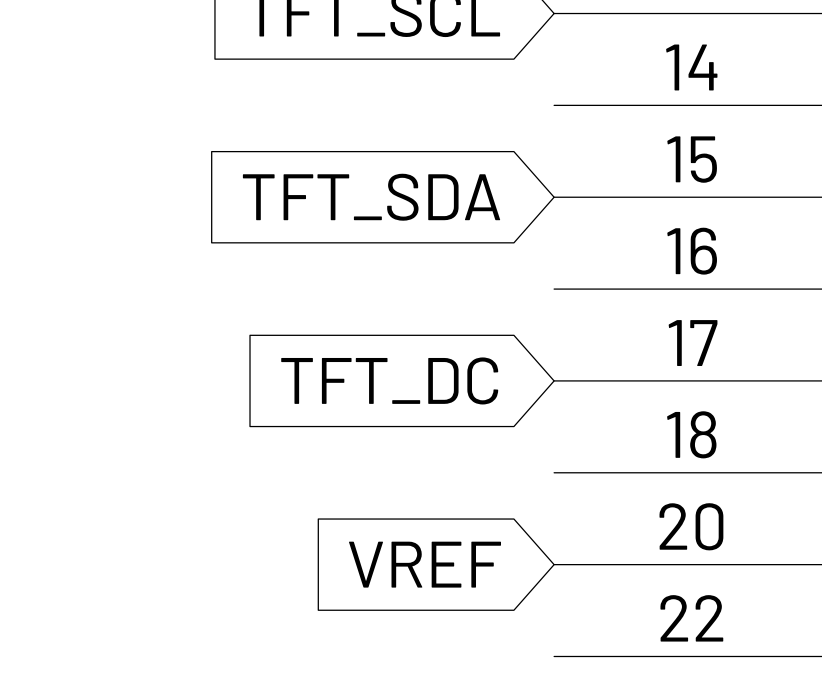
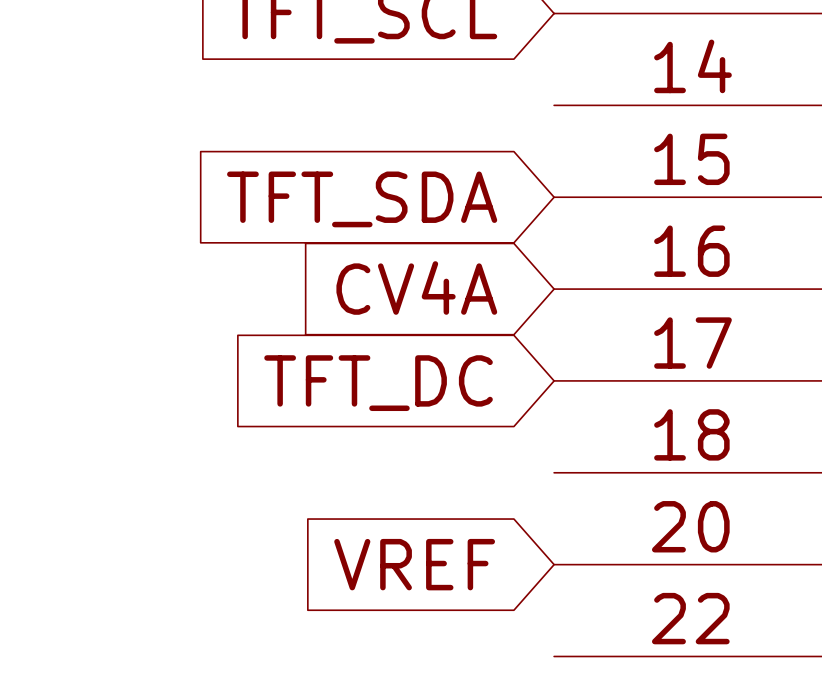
global label: none -> CV4A (416, 287)

